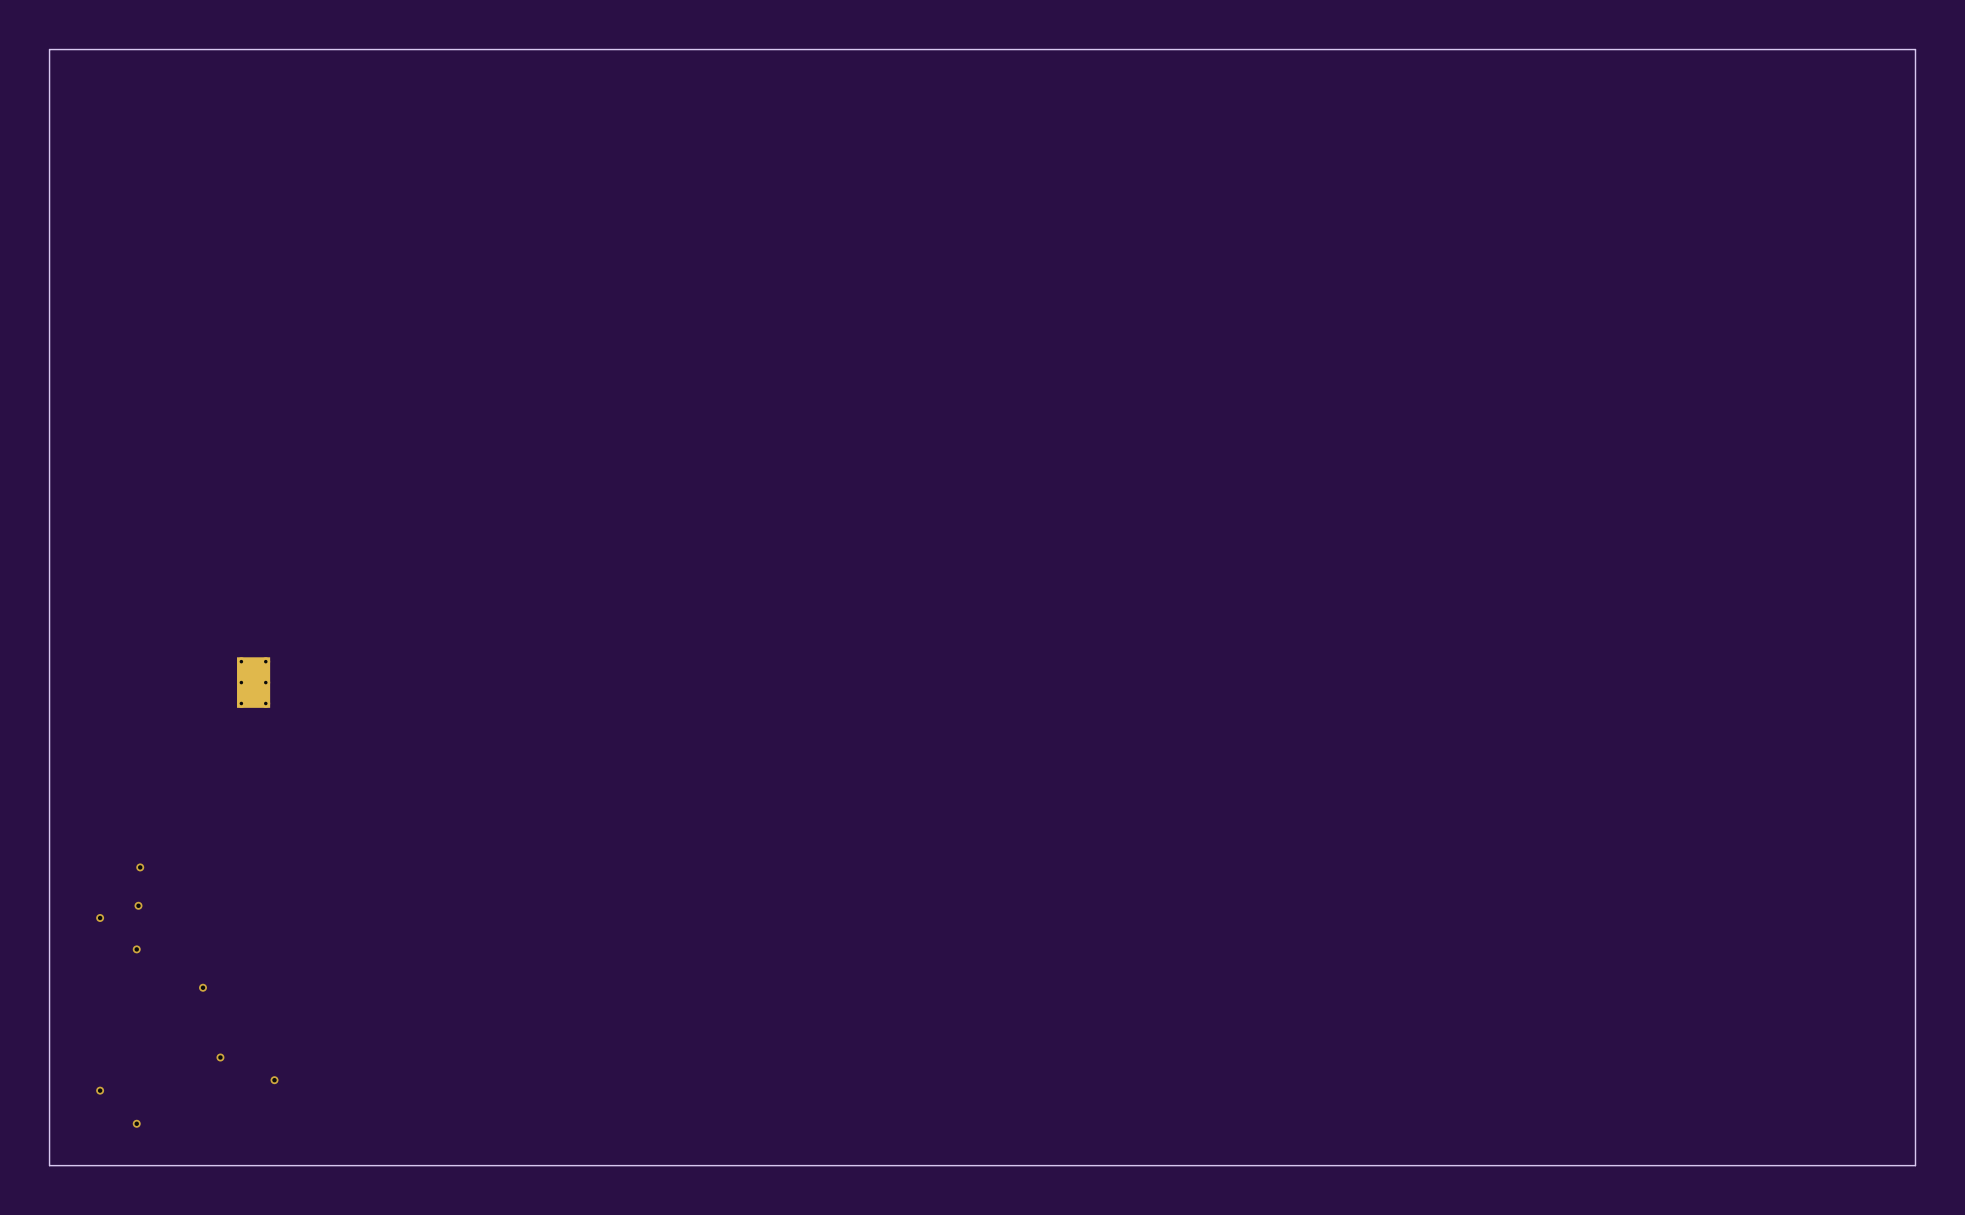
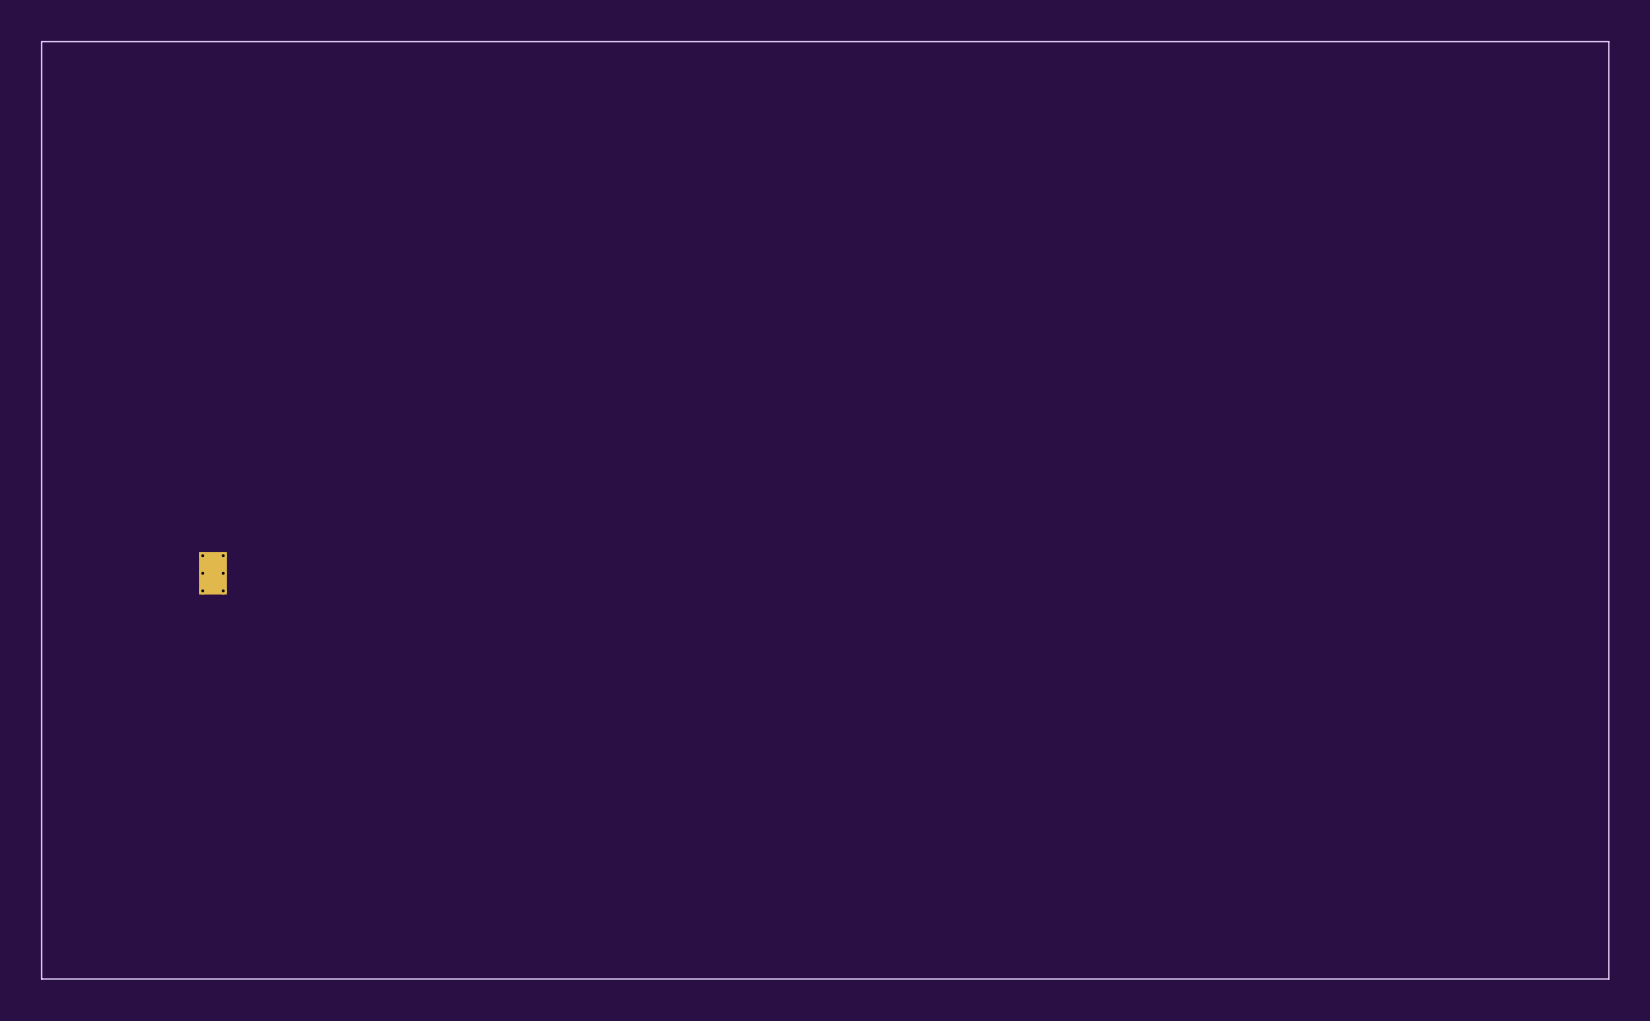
via: (140, 867) -> none
via: (138, 905) -> none
via: (100, 917) -> none
via: (136, 949) -> none
via: (203, 987) -> none
via: (220, 1057) -> none
via: (274, 1080) -> none
via: (100, 1090) -> none
via: (136, 1123) -> none

